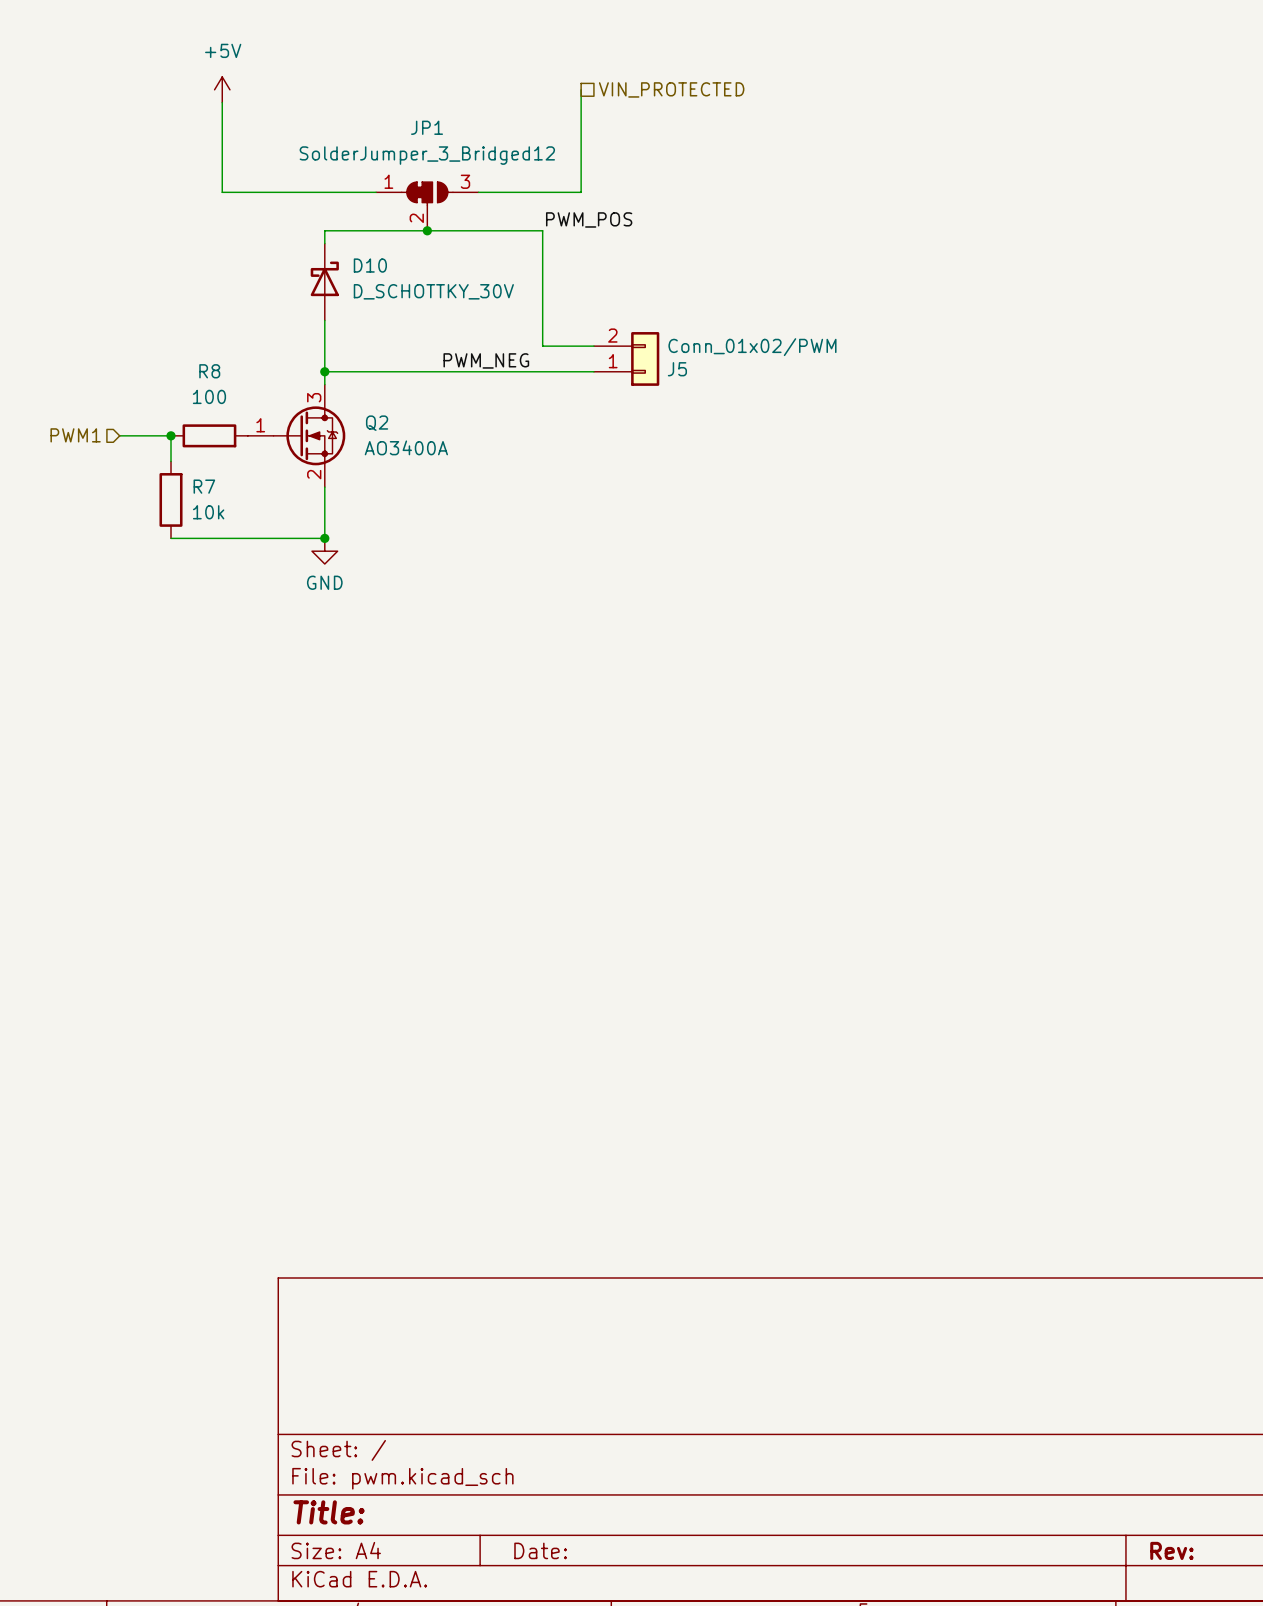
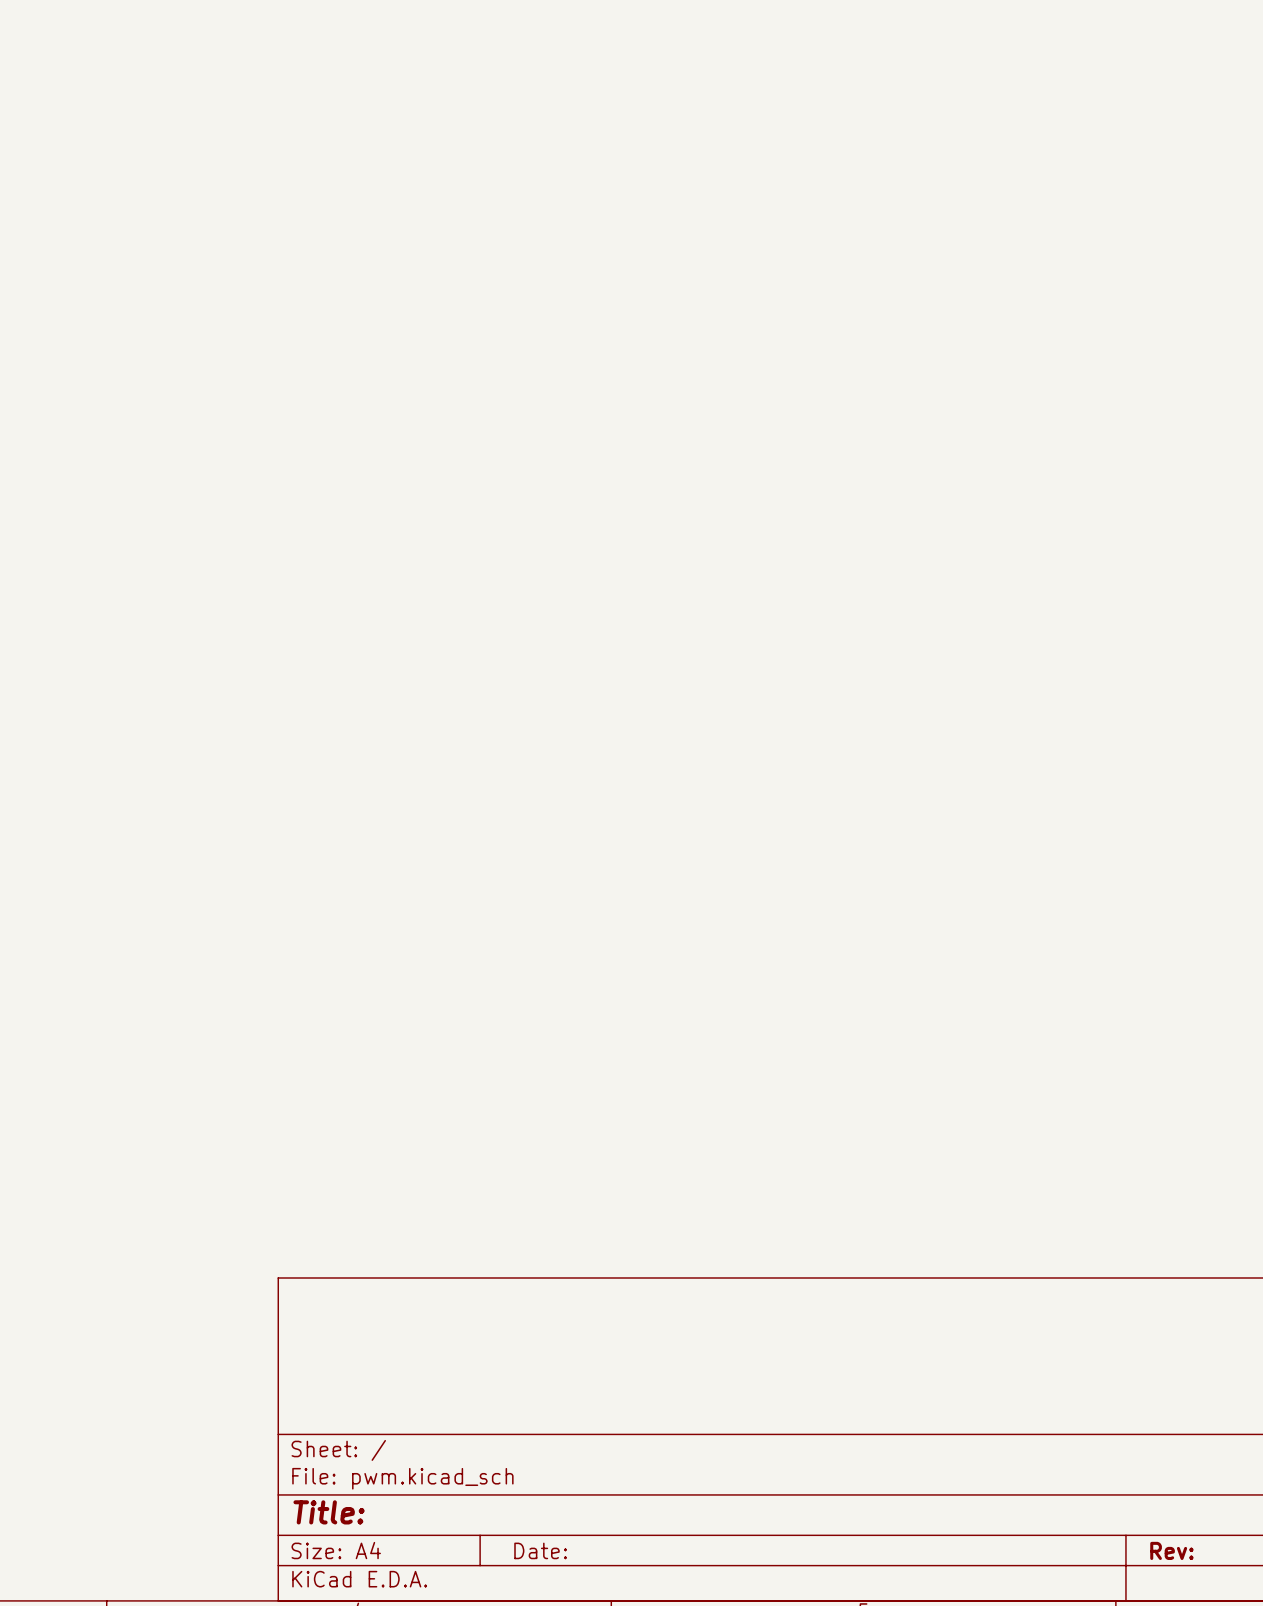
power symbol: +5V (222, 89) -> none
wire: (581, 89) (581, 192) (478, 192) -> none
hierarchical label: VIN_PROTECTED (671, 89) -> none
wire: (222, 102) (222, 192) (376, 192) -> none
JP1: SolderJumper_3_Bridged12 (427, 206) -> none
label: PWM_POS (589, 219) -> none
junction: (427, 230) -> none
wire: (324, 243) (324, 230) (542, 230) (542, 346) (593, 346) -> none
D10: D_SCHOTTKY_30V (324, 282) -> none
wire: (324, 320) (324, 384) -> none
J5: Conn_01x02/PWM (626, 358) -> none
label: PWM_NEG (486, 360) -> none
wire: (324, 371) (593, 371) -> none
junction: (324, 371) -> none
hierarchical label: PWM1 (75, 435) -> none
wire: (119, 435) (171, 435) (171, 461) -> none
junction: (171, 435) -> none
R8: 100 (209, 435) -> none
Q2: AO3400A (296, 435) -> none
wire: (324, 487) (324, 538) (171, 538) -> none
R7: 10k (171, 499) -> none
junction: (324, 538) -> none
power symbol: GND (324, 551) -> none

